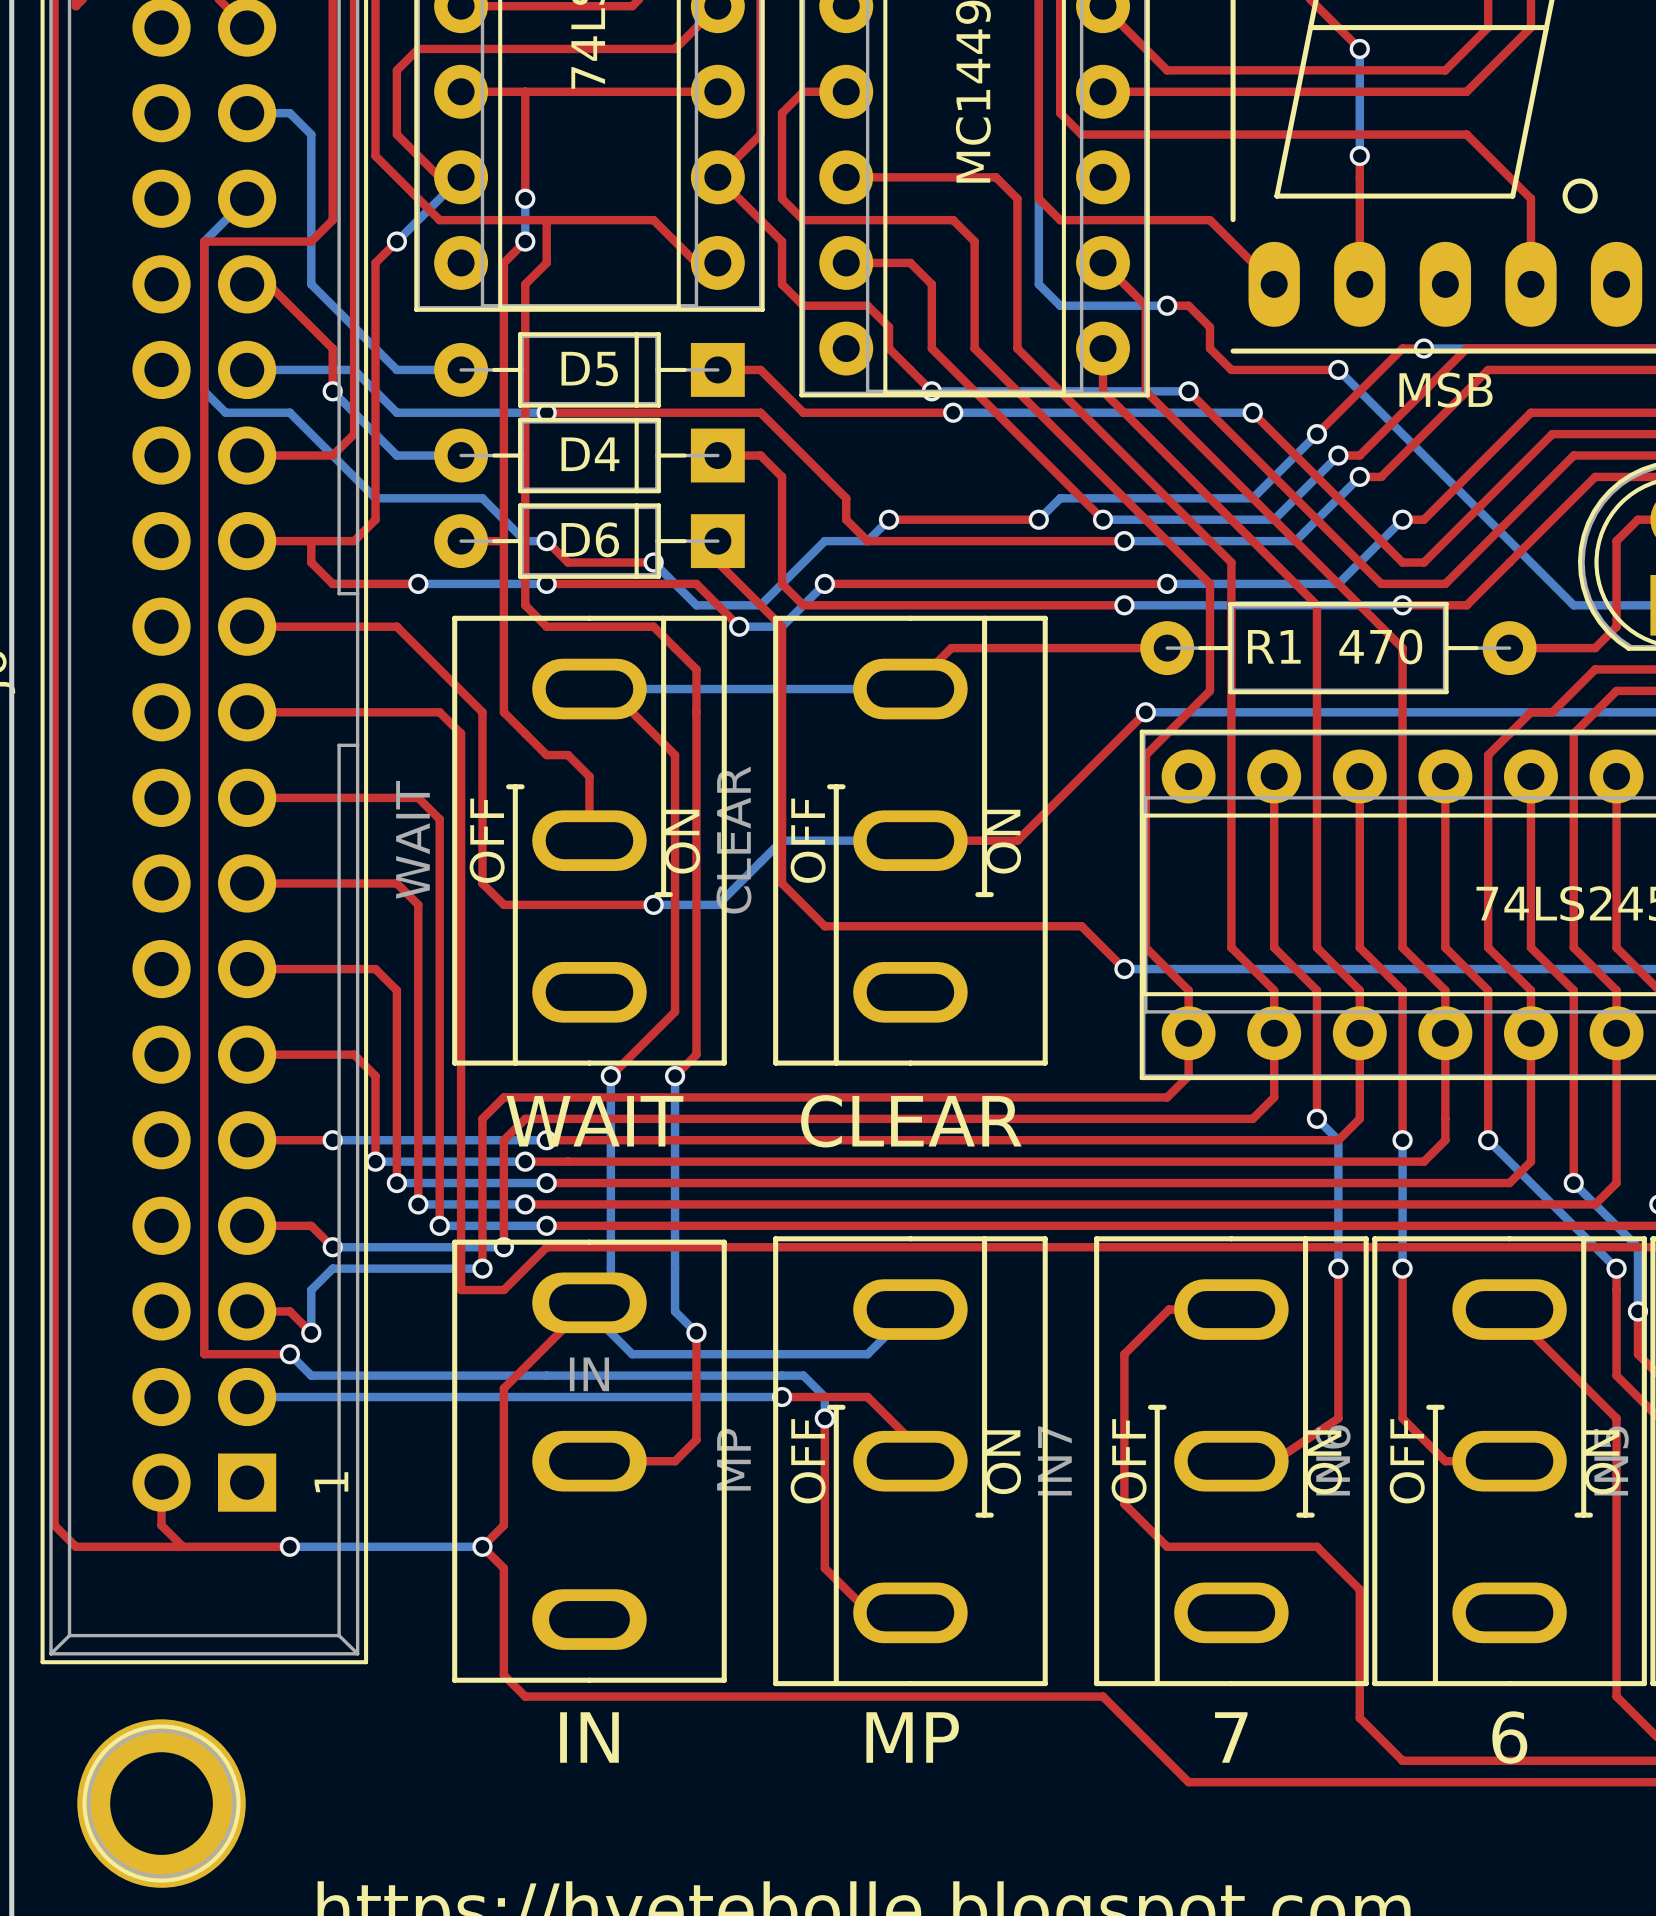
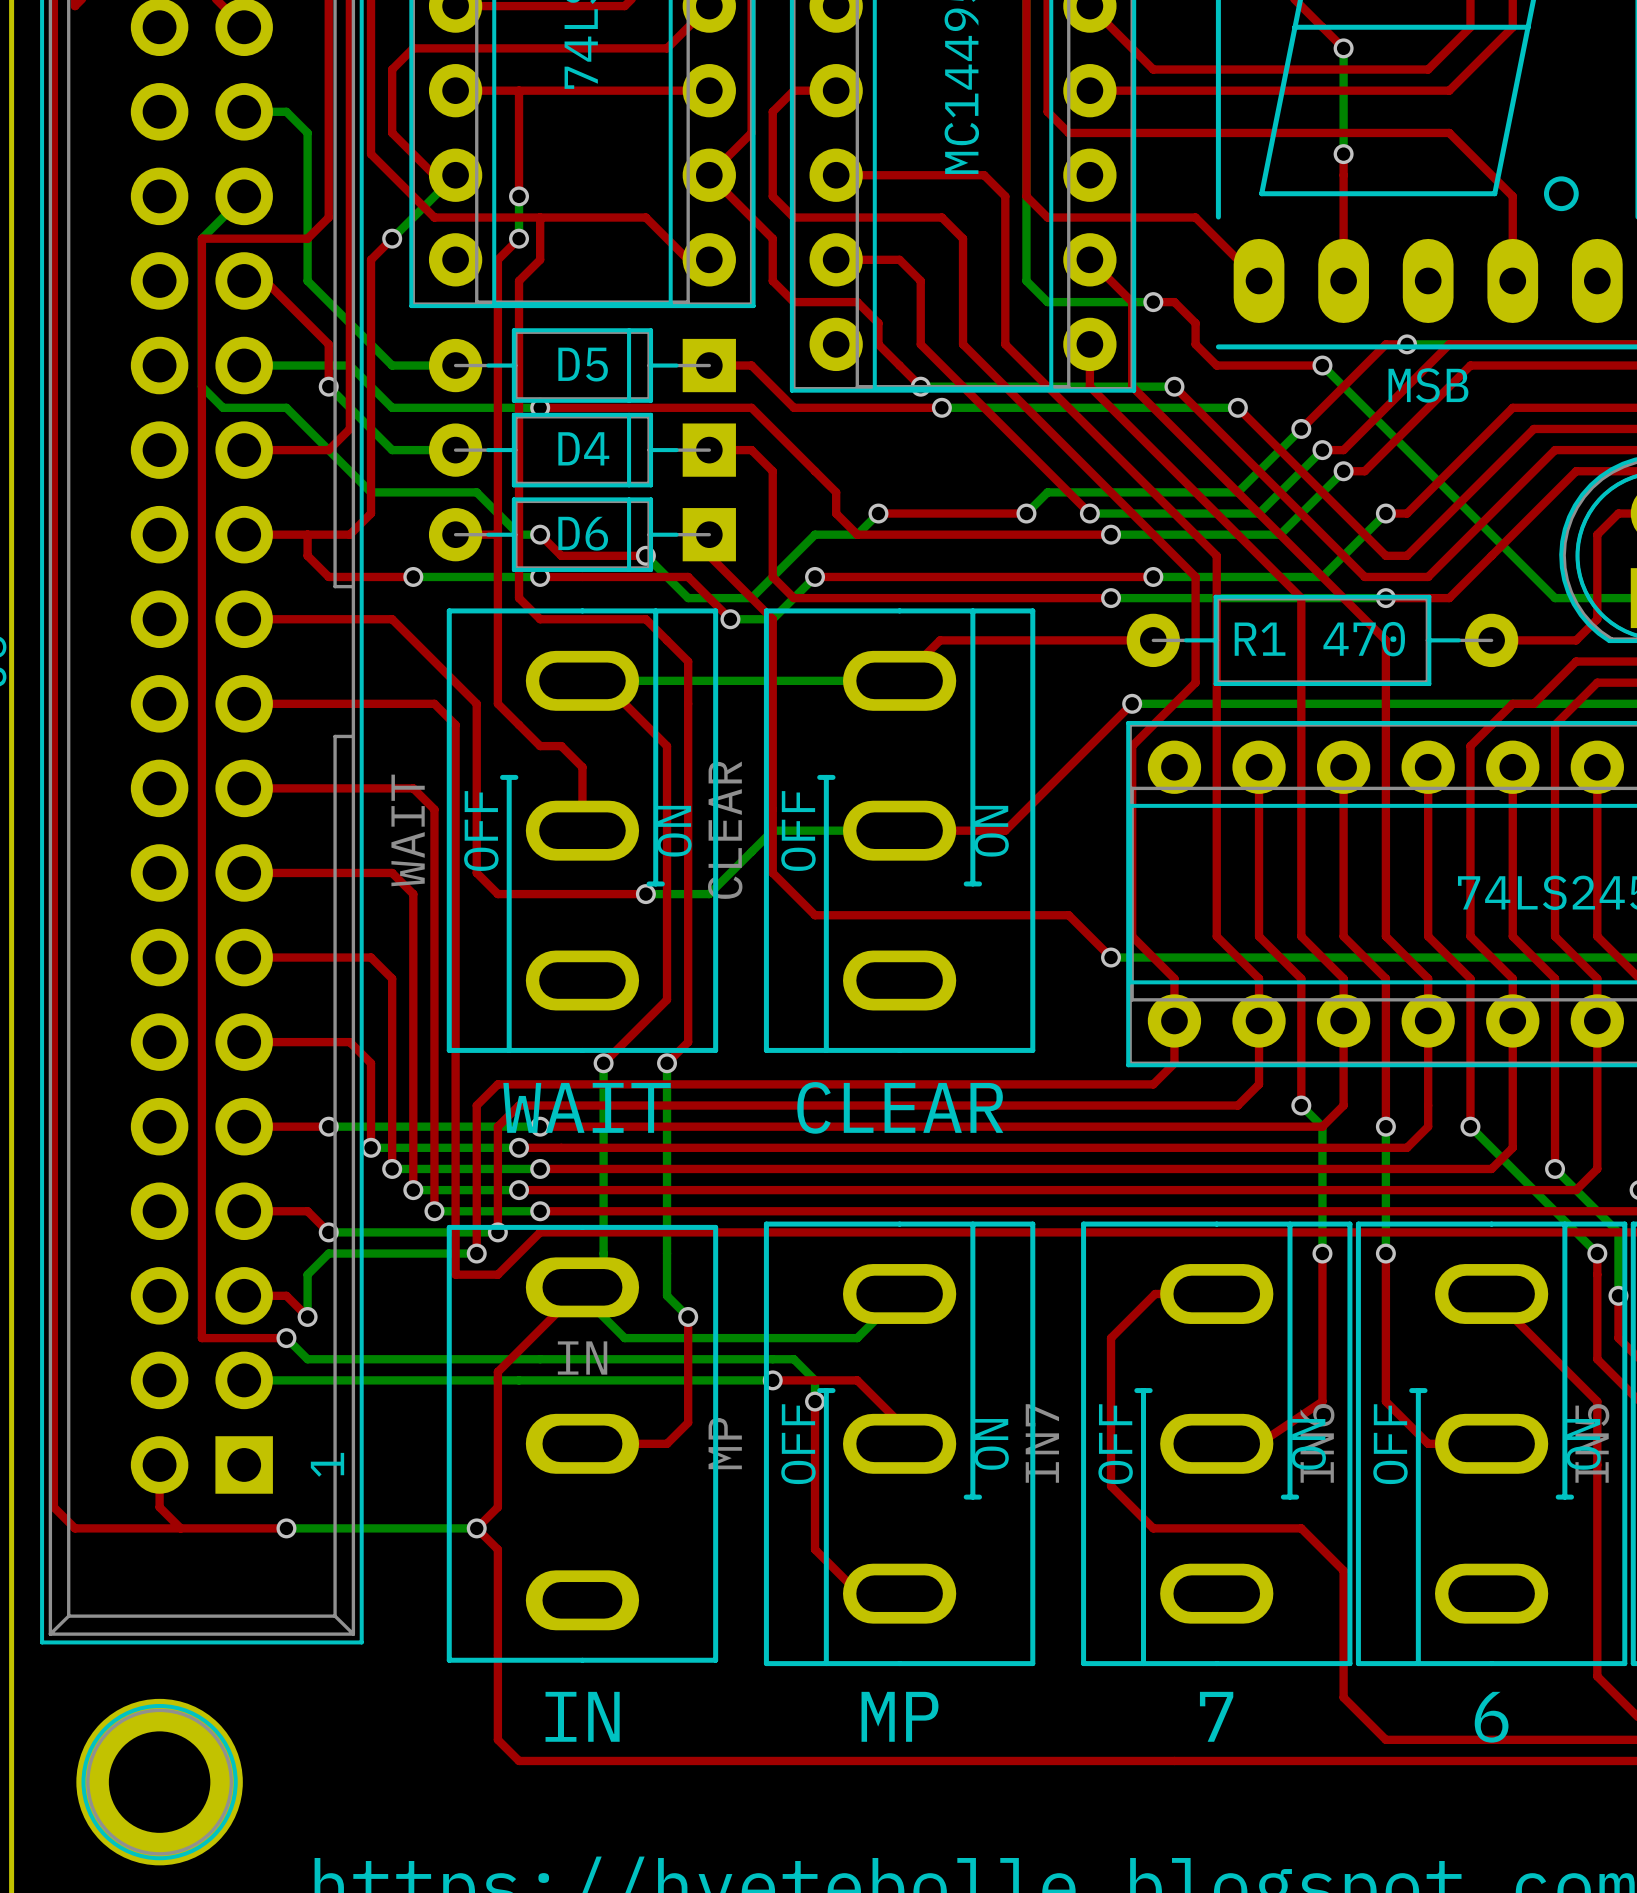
top track: (503, 1675) (525, 1696) (1103, 1696) (1188, 1782) -> (497, 1655) (497, 1739) (519, 1760) (1174, 1760)

